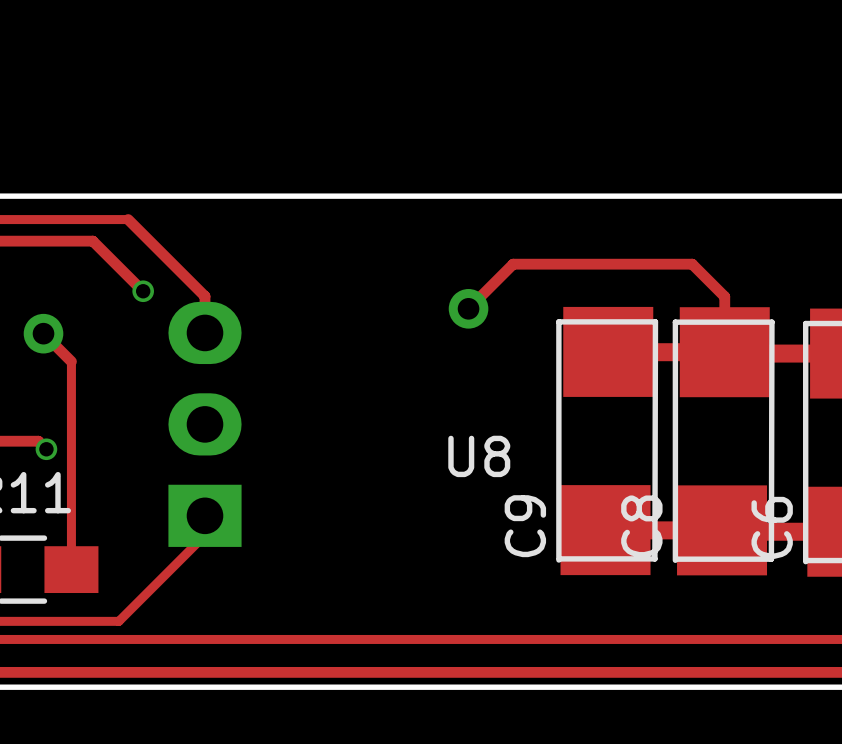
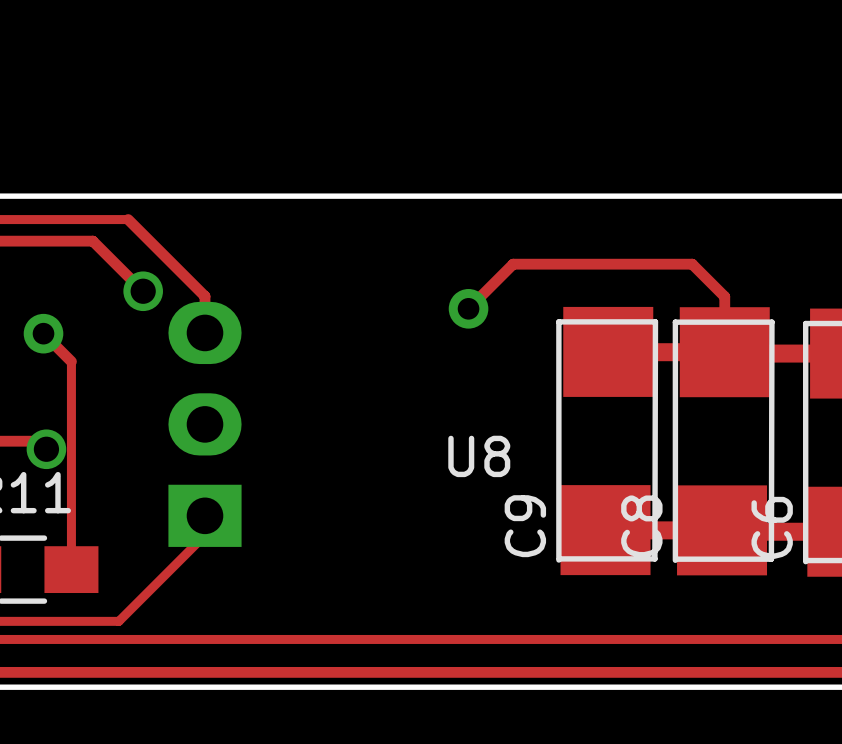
via size: [132, 280, 154, 303] -> [123, 271, 163, 312]
via size: [35, 438, 58, 461] -> [26, 429, 67, 470]

